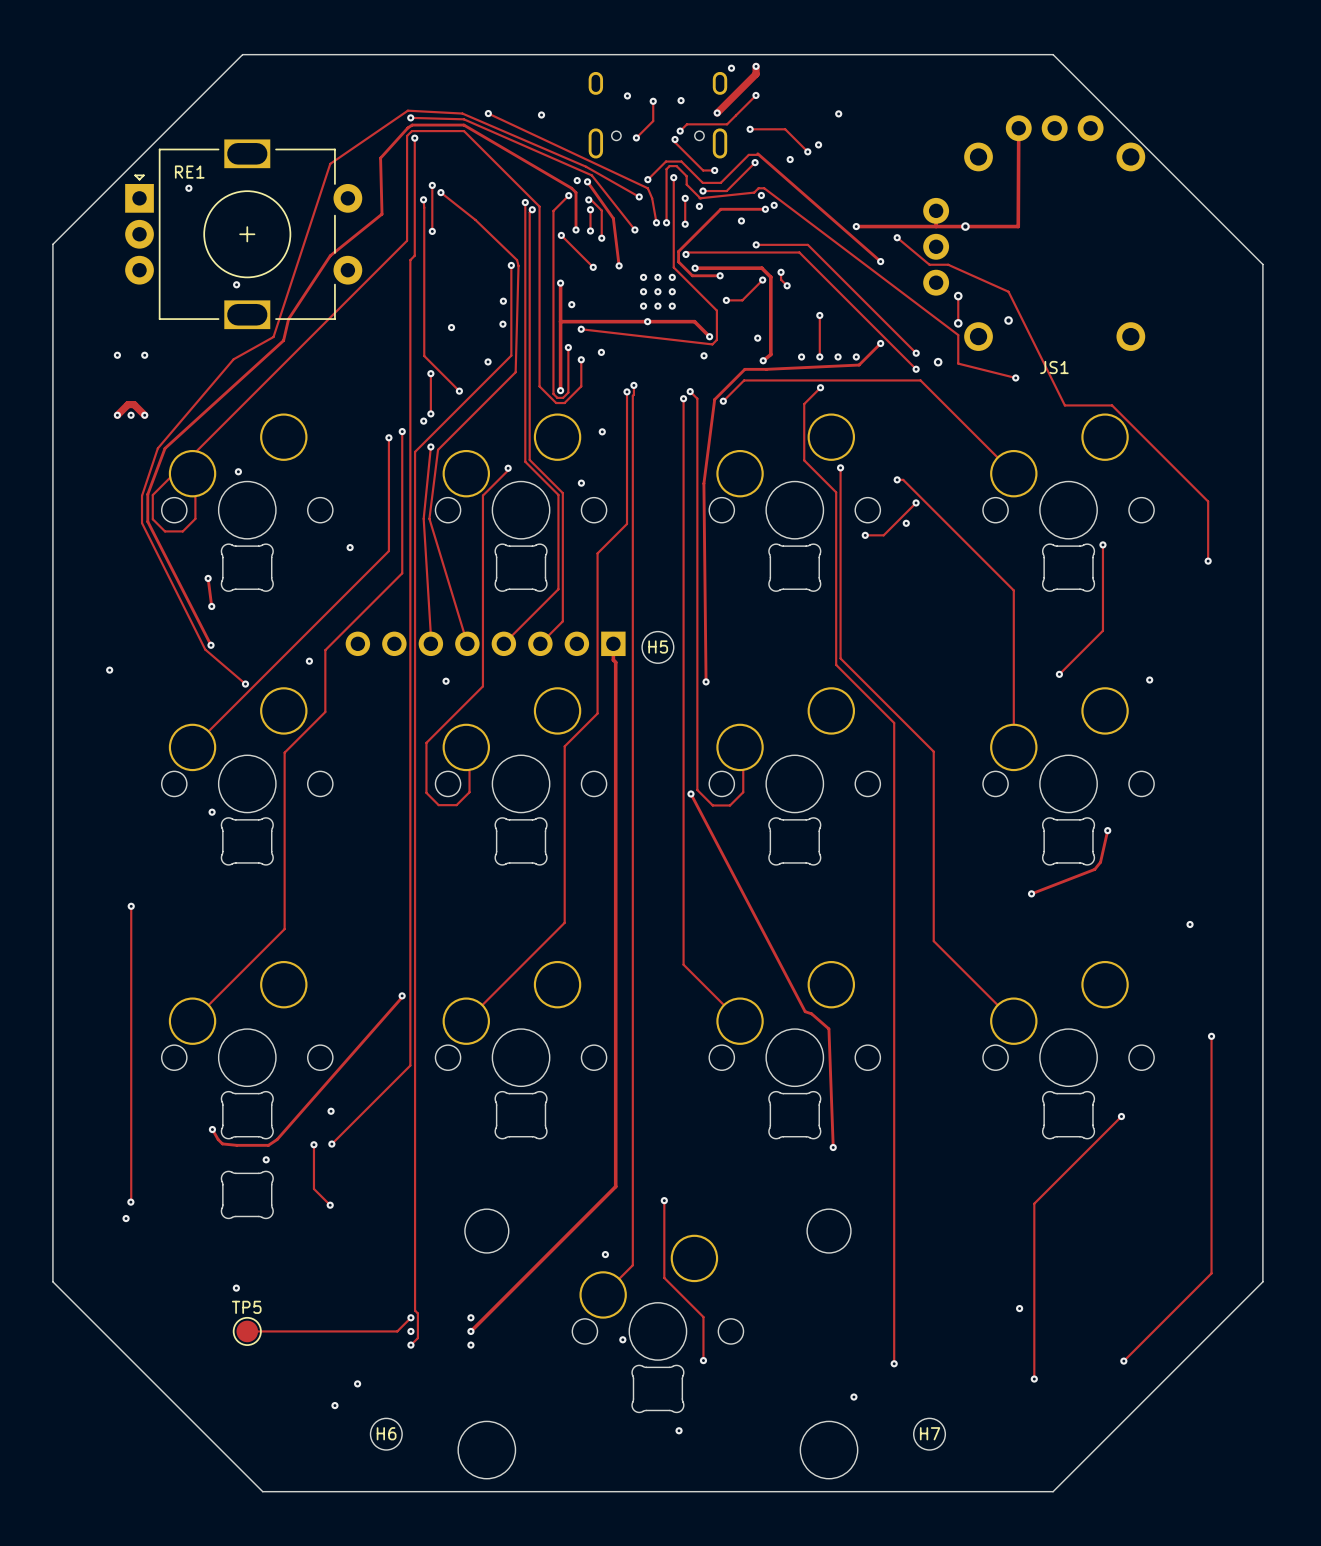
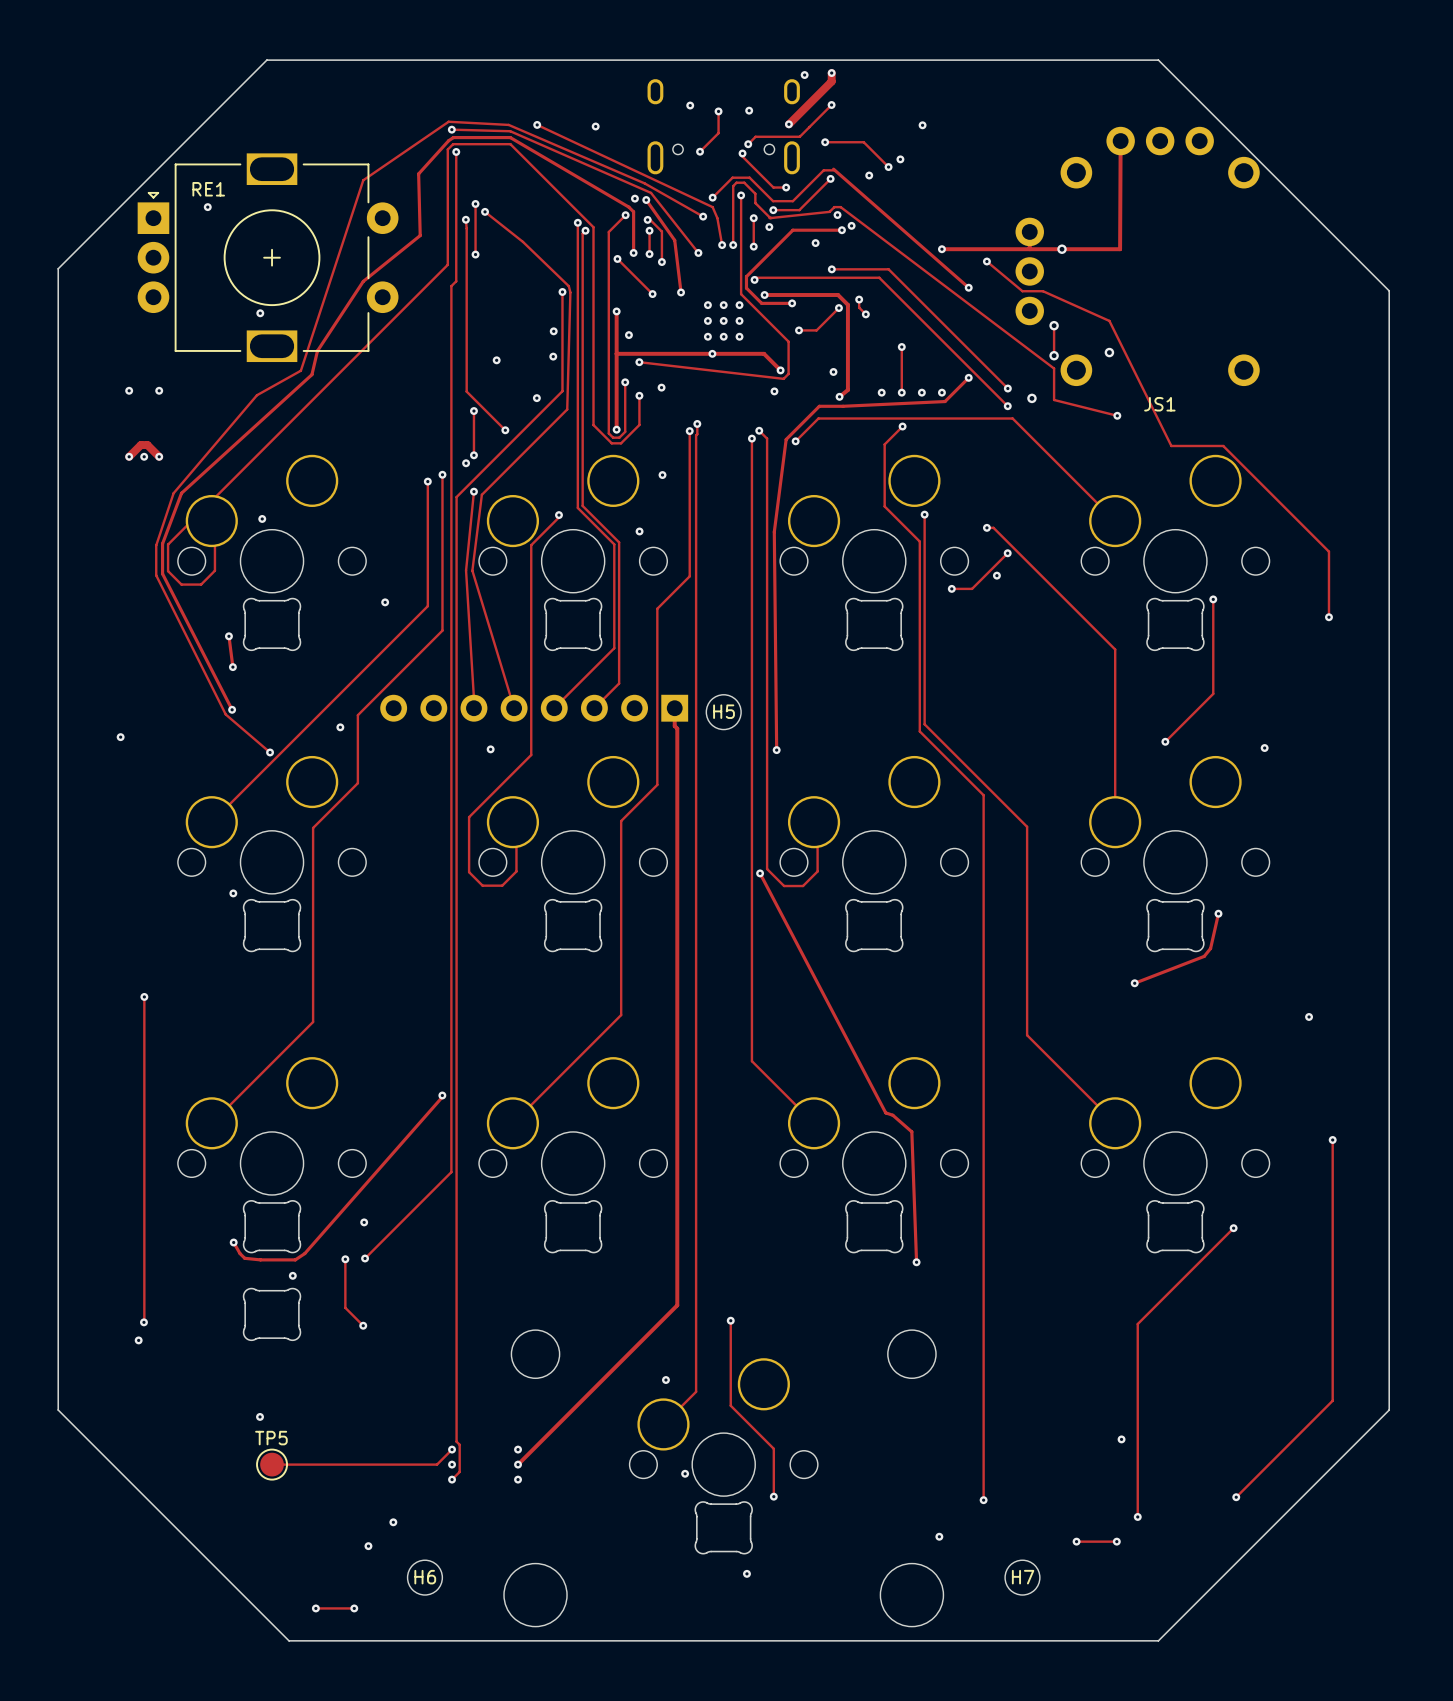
track: none -> (1076, 1541) (1116, 1541)
via: none -> (1076, 1541)
via: none -> (1116, 1541)
track: none -> (315, 1608) (354, 1608)
via: none -> (315, 1608)
via: none -> (354, 1608)

